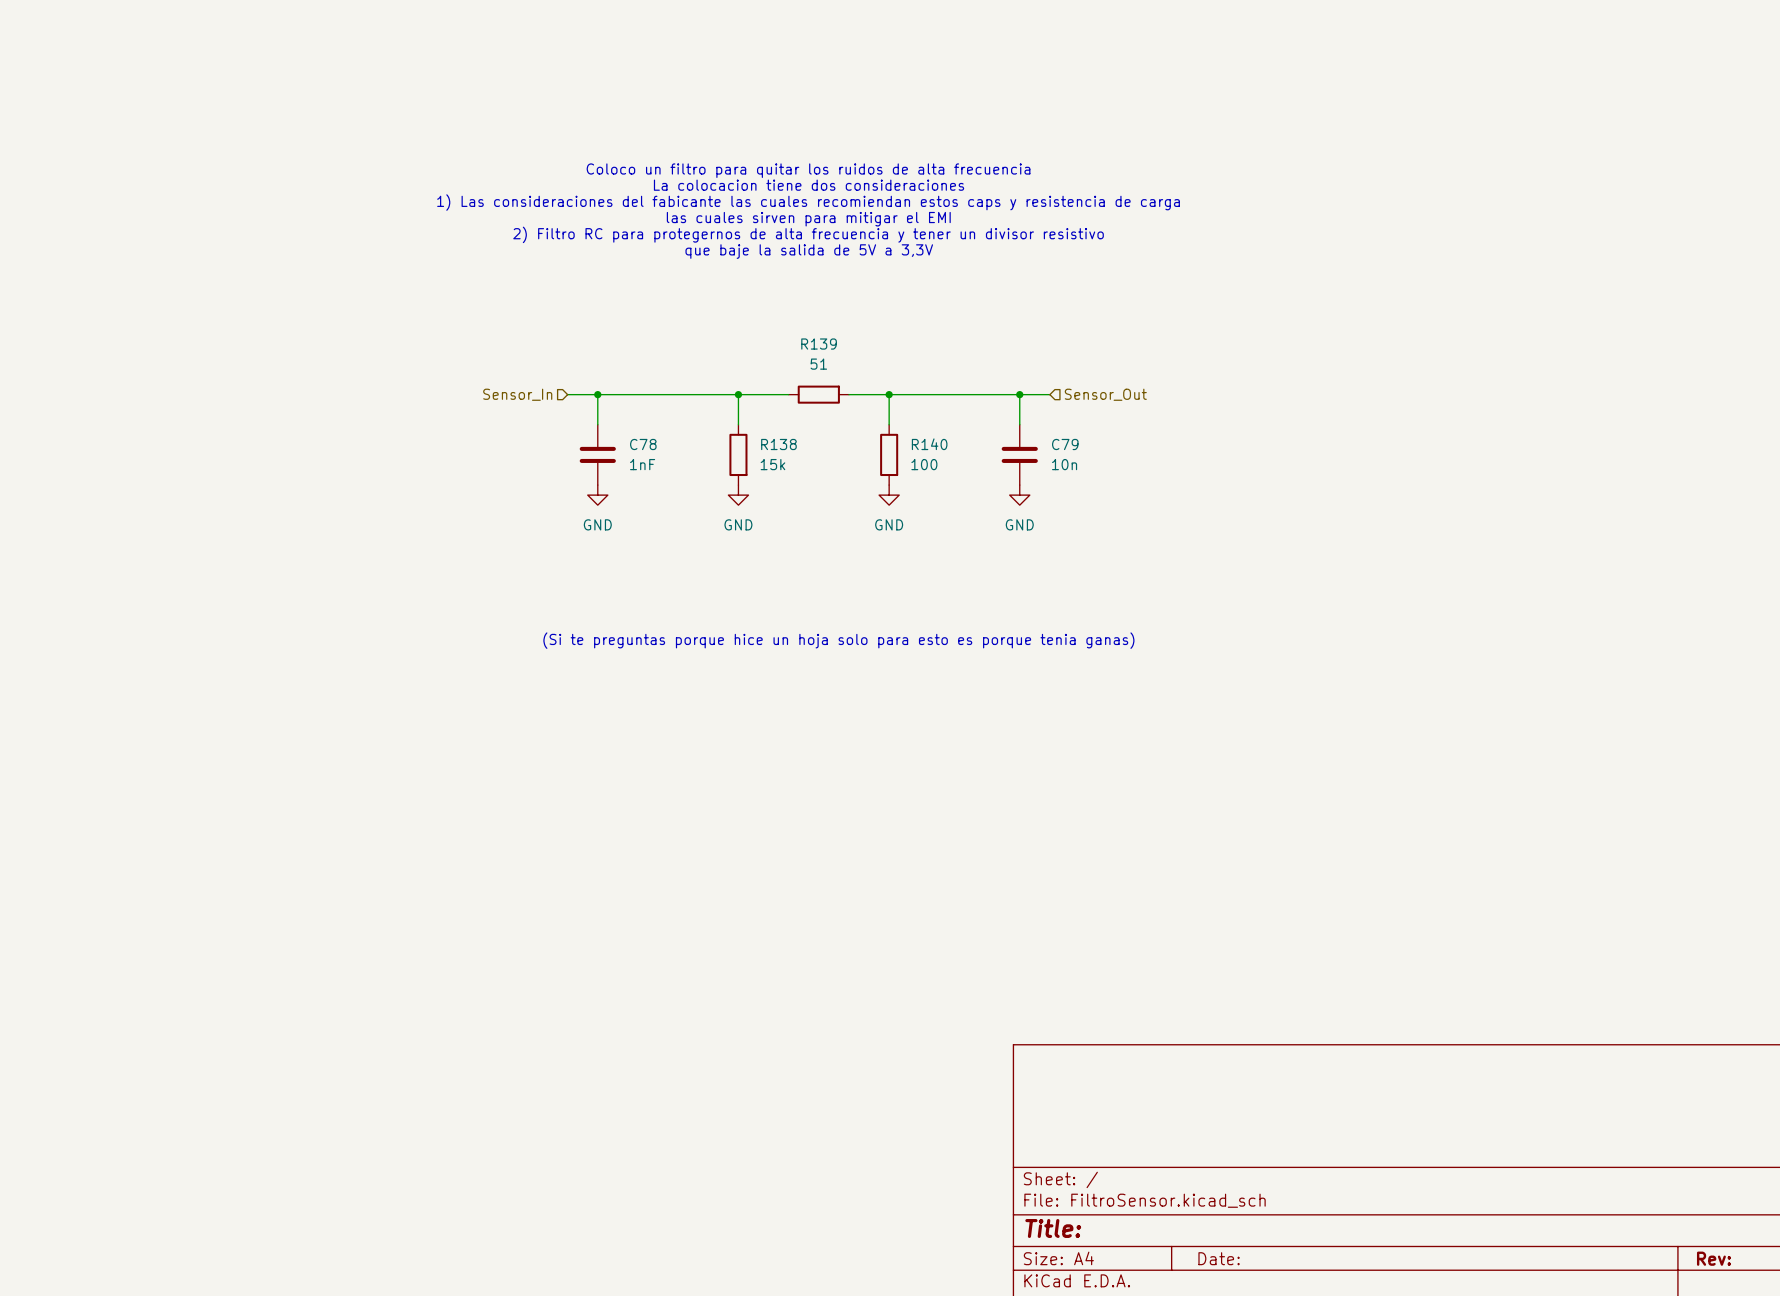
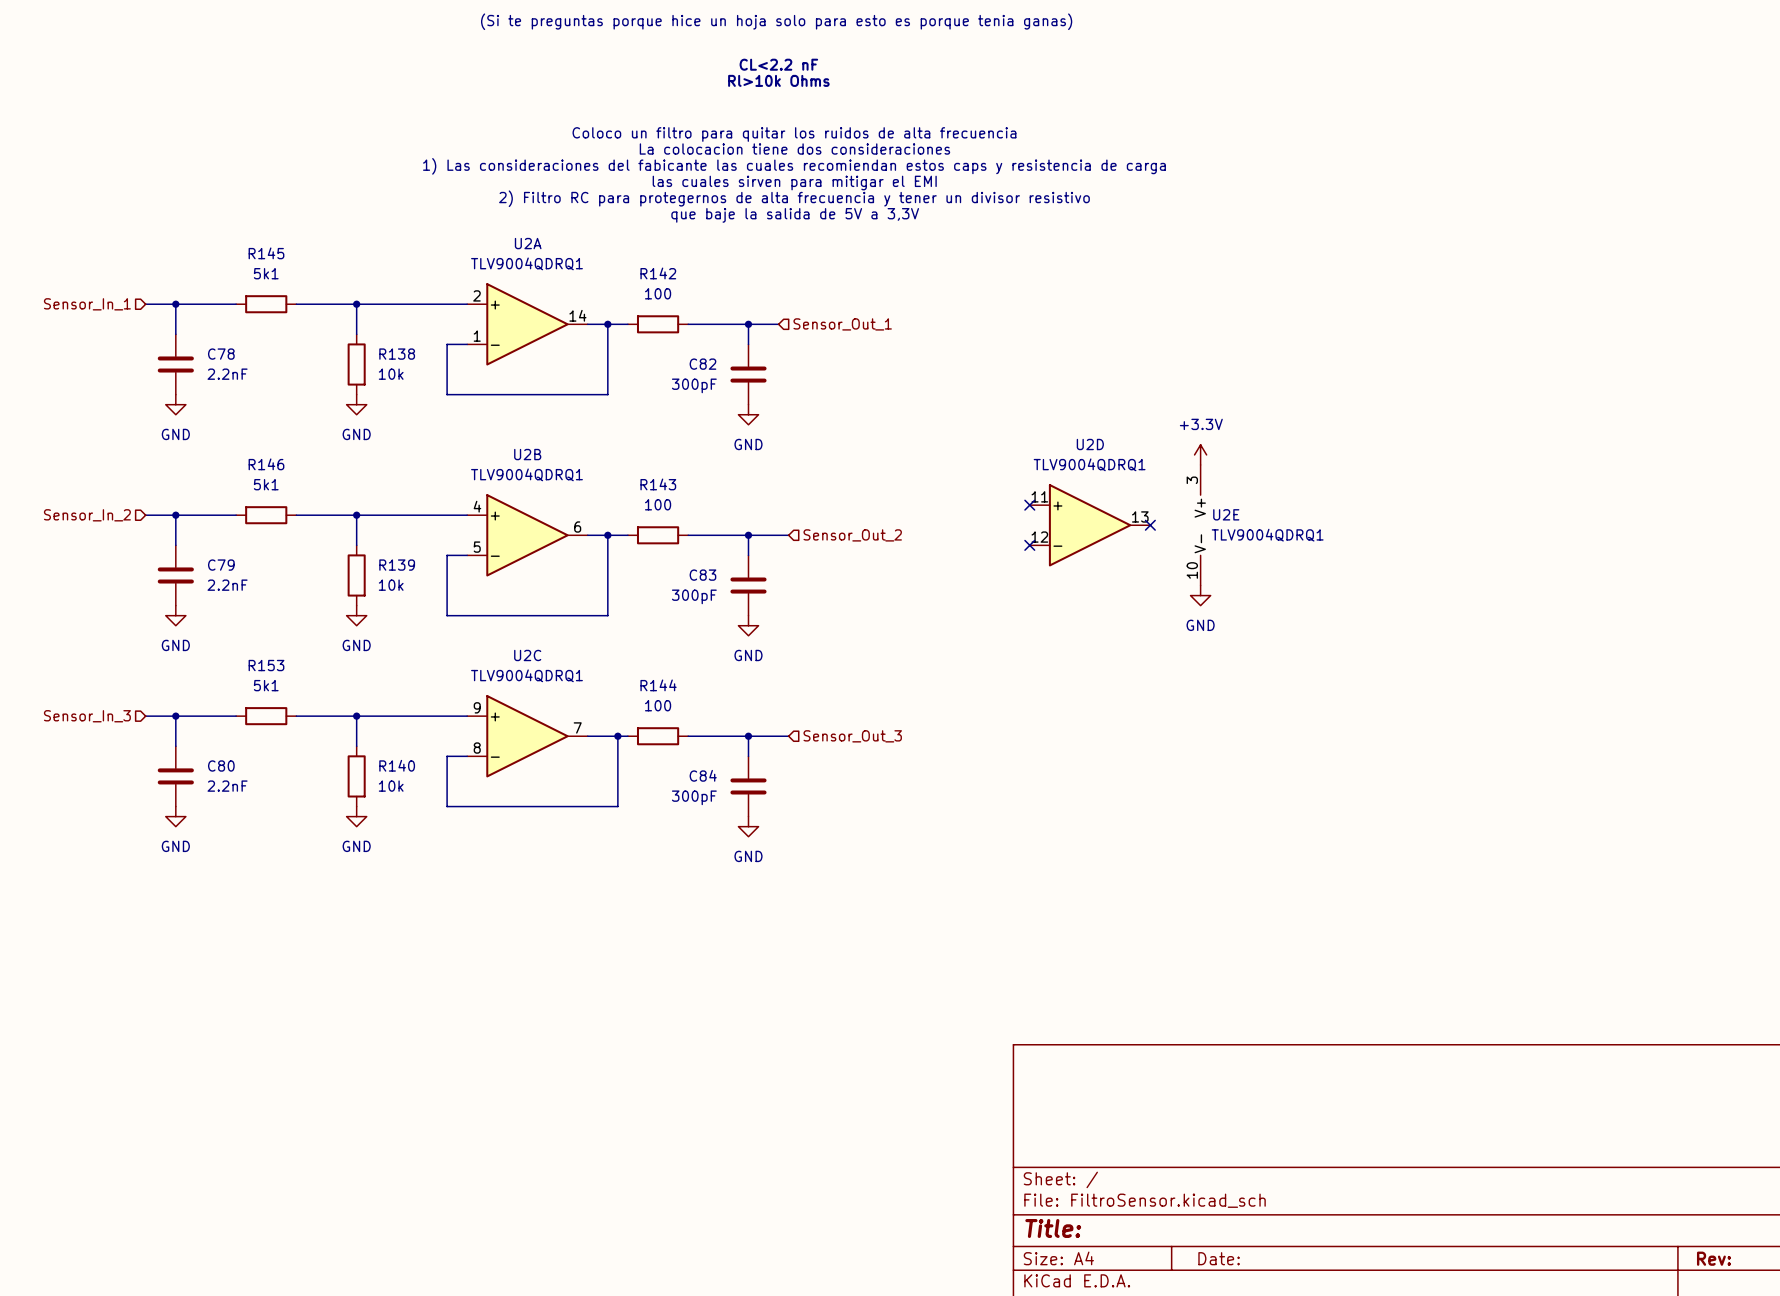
text: none -> (Si te preguntas porque hice un hoja solo para esto es porque tenia ganas) (776, 21)
text: none -> CL<2.2 nF (778, 64)
text: none -> Rl>10k Ohms (778, 80)
text position: Coloco un filtro para quitar los ruidos de alta frecuencia (808, 170) -> Coloco un filtro para quitar los ruidos de alta frecuencia (794, 134)
text position: La colocacion tiene dos consideraciones (809, 185) -> La colocacion tiene dos consideraciones (794, 149)
text position: 1) Las consideraciones del fabicante las cuales recomiendan estos caps y resistencia de carga (808, 202) -> 1) Las consideraciones del fabicante las cuales recomiendan estos caps y resistencia de carga (794, 166)
text position: las cuales sirven para mitigar el EMI (808, 219) -> las cuales sirven para mitigar el EMI (794, 183)
text position: 2) Filtro RC para protegernos de alta frecuencia y tener un divisor resistivo (808, 234) -> 2) Filtro RC para protegernos de alta frecuencia y tener un divisor resistivo (794, 198)
text position: que baje la salida de 5V a 3,3V (809, 251) -> que baje la salida de 5V a 3,3V (795, 215)
hierarchical label: none -> Sensor_In_1 (87, 304)
wire: none -> (145, 304) (236, 304)
wire: none -> (175, 304) (175, 334)
junction: none -> (175, 304)
R145: none -> 5k1 (266, 304)
wire: none -> (296, 304) (467, 304)
wire: none -> (356, 304) (356, 334)
junction: none -> (356, 304)
U2A: none -> TLV9004QDRQ1 (527, 324)
wire: none -> (587, 324) (627, 324)
junction: none -> (607, 324)
R142: none -> 100 (658, 324)
wire: none -> (688, 324) (778, 324)
wire: none -> (748, 324) (748, 344)
junction: none -> (748, 324)
hierarchical label: none -> Sensor_Out_1 (842, 324)
wire: none -> (467, 344) (447, 344) (447, 394) (567, 394)
R139 value: 51 (818, 364) -> 10k (391, 585)
C82: none -> 300pF (748, 374)
hierarchical label: Sensor_In (517, 394) -> none
wire: (597, 394) (597, 424) -> none
junction: (597, 394) -> none
wire: (607, 394) (788, 394) -> (607, 394) (607, 324)
wire: (738, 394) (738, 424) -> none
junction: (738, 394) -> none
R139 rotation: 0° (818, 394) -> 90° clockwise (356, 575)
R139 position: (818, 394) -> (356, 575)
wire: (848, 394) (1049, 394) -> none
wire: (889, 394) (889, 424) -> none
junction: (889, 394) -> none
wire: (1019, 394) (1019, 424) -> none
junction: (1019, 394) -> none
hierarchical label: Sensor_Out (1105, 394) -> none
power symbol: none -> GND (175, 404)
power symbol: none -> GND (356, 404)
power symbol: none -> GND (748, 414)
C78 position: (597, 454) -> (175, 364)
R138 position: (738, 454) -> (356, 364)
R140 position: (889, 454) -> (356, 776)
C79 position: (1019, 454) -> (175, 575)
power symbol: none -> +3.3V (1200, 454)
C78 value: 1nF (642, 464) -> 2.2nF (227, 374)
R138 value: 15k (772, 464) -> 10k (391, 374)
R140 value: 100 (924, 464) -> 10k (391, 786)
C79 value: 10n (1064, 464) -> 2.2nF (227, 585)
power symbol: GND (597, 495) -> none
power symbol: GND (738, 495) -> none
power symbol: GND (889, 495) -> none
power symbol: GND (1019, 495) -> none
no-connect mark: none -> (1029, 505)
hierarchical label: none -> Sensor_In_2 (87, 515)
wire: none -> (145, 515) (236, 515)
wire: none -> (175, 515) (175, 545)
junction: none -> (175, 515)
R146: none -> 5k1 (266, 515)
wire: none -> (296, 515) (467, 515)
wire: none -> (356, 515) (356, 545)
junction: none -> (356, 515)
U2D: none -> TLV9004QDRQ1 (1090, 525)
no-connect mark: none -> (1150, 525)
U2E: none -> TLV9004QDRQ1 (1200, 525)
U2B: none -> TLV9004QDRQ1 (527, 535)
wire: none -> (587, 535) (627, 535)
wire: none -> (607, 535) (607, 615) (447, 615) (447, 555) (467, 555)
junction: none -> (607, 535)
R143: none -> 100 (658, 535)
wire: none -> (688, 535) (788, 535)
wire: none -> (748, 535) (748, 555)
junction: none -> (748, 535)
hierarchical label: none -> Sensor_Out_2 (852, 535)
no-connect mark: none -> (1029, 545)
C83: none -> 300pF (748, 585)
power symbol: none -> GND (1200, 595)
power symbol: none -> GND (175, 615)
power symbol: none -> GND (356, 615)
power symbol: none -> GND (748, 625)
text: (Si te preguntas porque hice un hoja solo para esto es porque tenia ganas) (838, 640) -> none
hierarchical label: none -> Sensor_In_3 (87, 716)
wire: none -> (145, 716) (236, 716)
wire: none -> (175, 716) (175, 746)
junction: none -> (175, 716)
R153: none -> 5k1 (266, 716)
wire: none -> (296, 716) (467, 716)
wire: none -> (356, 716) (356, 746)
junction: none -> (356, 716)
U2C: none -> TLV9004QDRQ1 (527, 736)
wire: none -> (587, 736) (627, 736)
wire: none -> (617, 736) (617, 806) (447, 806) (447, 756) (467, 756)
junction: none -> (617, 736)
R144: none -> 100 (658, 736)
wire: none -> (688, 736) (788, 736)
wire: none -> (748, 736) (748, 756)
junction: none -> (748, 736)
hierarchical label: none -> Sensor_Out_3 (852, 736)
C80: none -> 2.2nF (175, 776)
C84: none -> 300pF (748, 786)
power symbol: none -> GND (175, 816)
power symbol: none -> GND (356, 816)
power symbol: none -> GND (748, 826)

